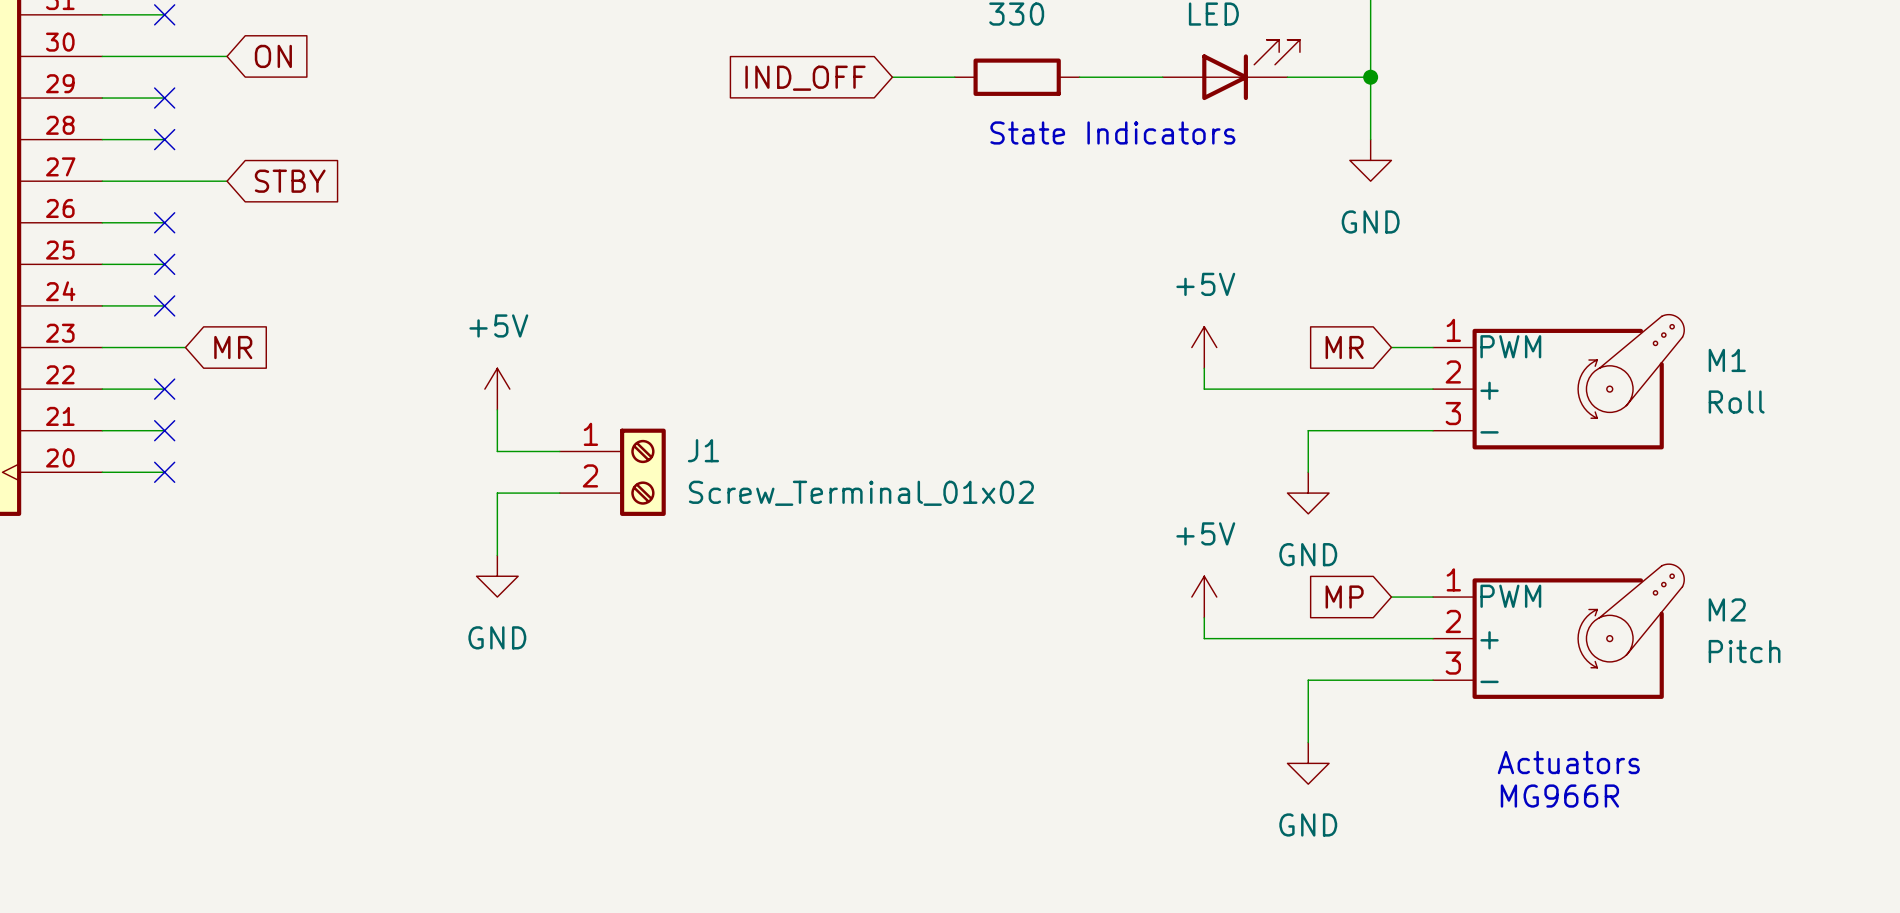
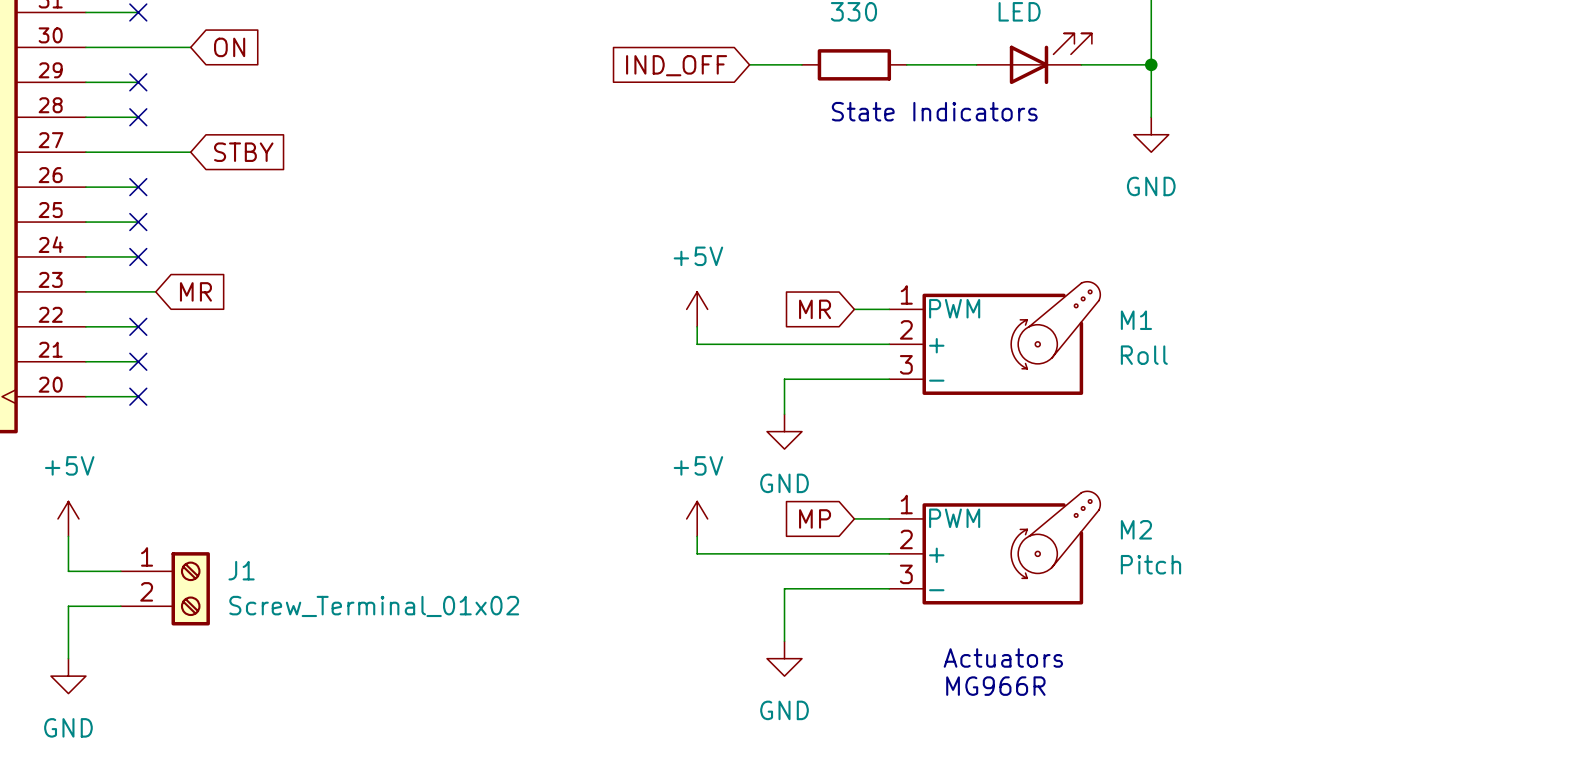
power symbol: +5V (1204, 347) -> none
global label position: MR (1344, 347) -> MR (815, 309)
wire: (1391, 347) (1433, 347) -> (854, 309) (889, 309)
power symbol: none -> +5V (697, 309)
wire: (1204, 368) (1204, 389) (1433, 389) -> (697, 326) (697, 344) (889, 344)
M1 position: (1558, 382) -> (994, 338)
power symbol: +5V (497, 389) -> none
wire: (497, 409) (497, 451) (559, 451) -> none
wire: (1433, 430) (1308, 430) (1308, 472) -> (889, 379) (784, 379) (784, 414)
J1 position: (612, 472) -> (165, 588)
wire: (559, 493) (497, 493) (497, 555) -> none
power symbol: GND (1308, 493) -> none
power symbol: none -> GND (784, 431)
power symbol: GND (497, 576) -> none
power symbol: +5V (1204, 597) -> none
global label position: MP (1344, 597) -> MP (815, 518)
wire: (1391, 597) (1433, 597) -> (854, 518) (889, 518)
power symbol: none -> +5V (68, 518)
power symbol: none -> +5V (697, 518)
wire: (1204, 617) (1204, 638) (1433, 638) -> (697, 536) (697, 553) (889, 553)
M2 position: (1558, 631) -> (994, 547)
wire: none -> (68, 536) (68, 571) (120, 571)
wire: (1433, 680) (1308, 680) (1308, 742) -> (889, 588) (784, 588) (784, 641)
wire: none -> (120, 606) (68, 606) (68, 658)
text position: Actuators (1568, 762) -> Actuators (1003, 657)
power symbol: GND (1308, 763) -> none
power symbol: none -> GND (784, 658)
text position: MG966R (1559, 796) -> MG966R (995, 686)
power symbol: none -> GND (68, 676)

